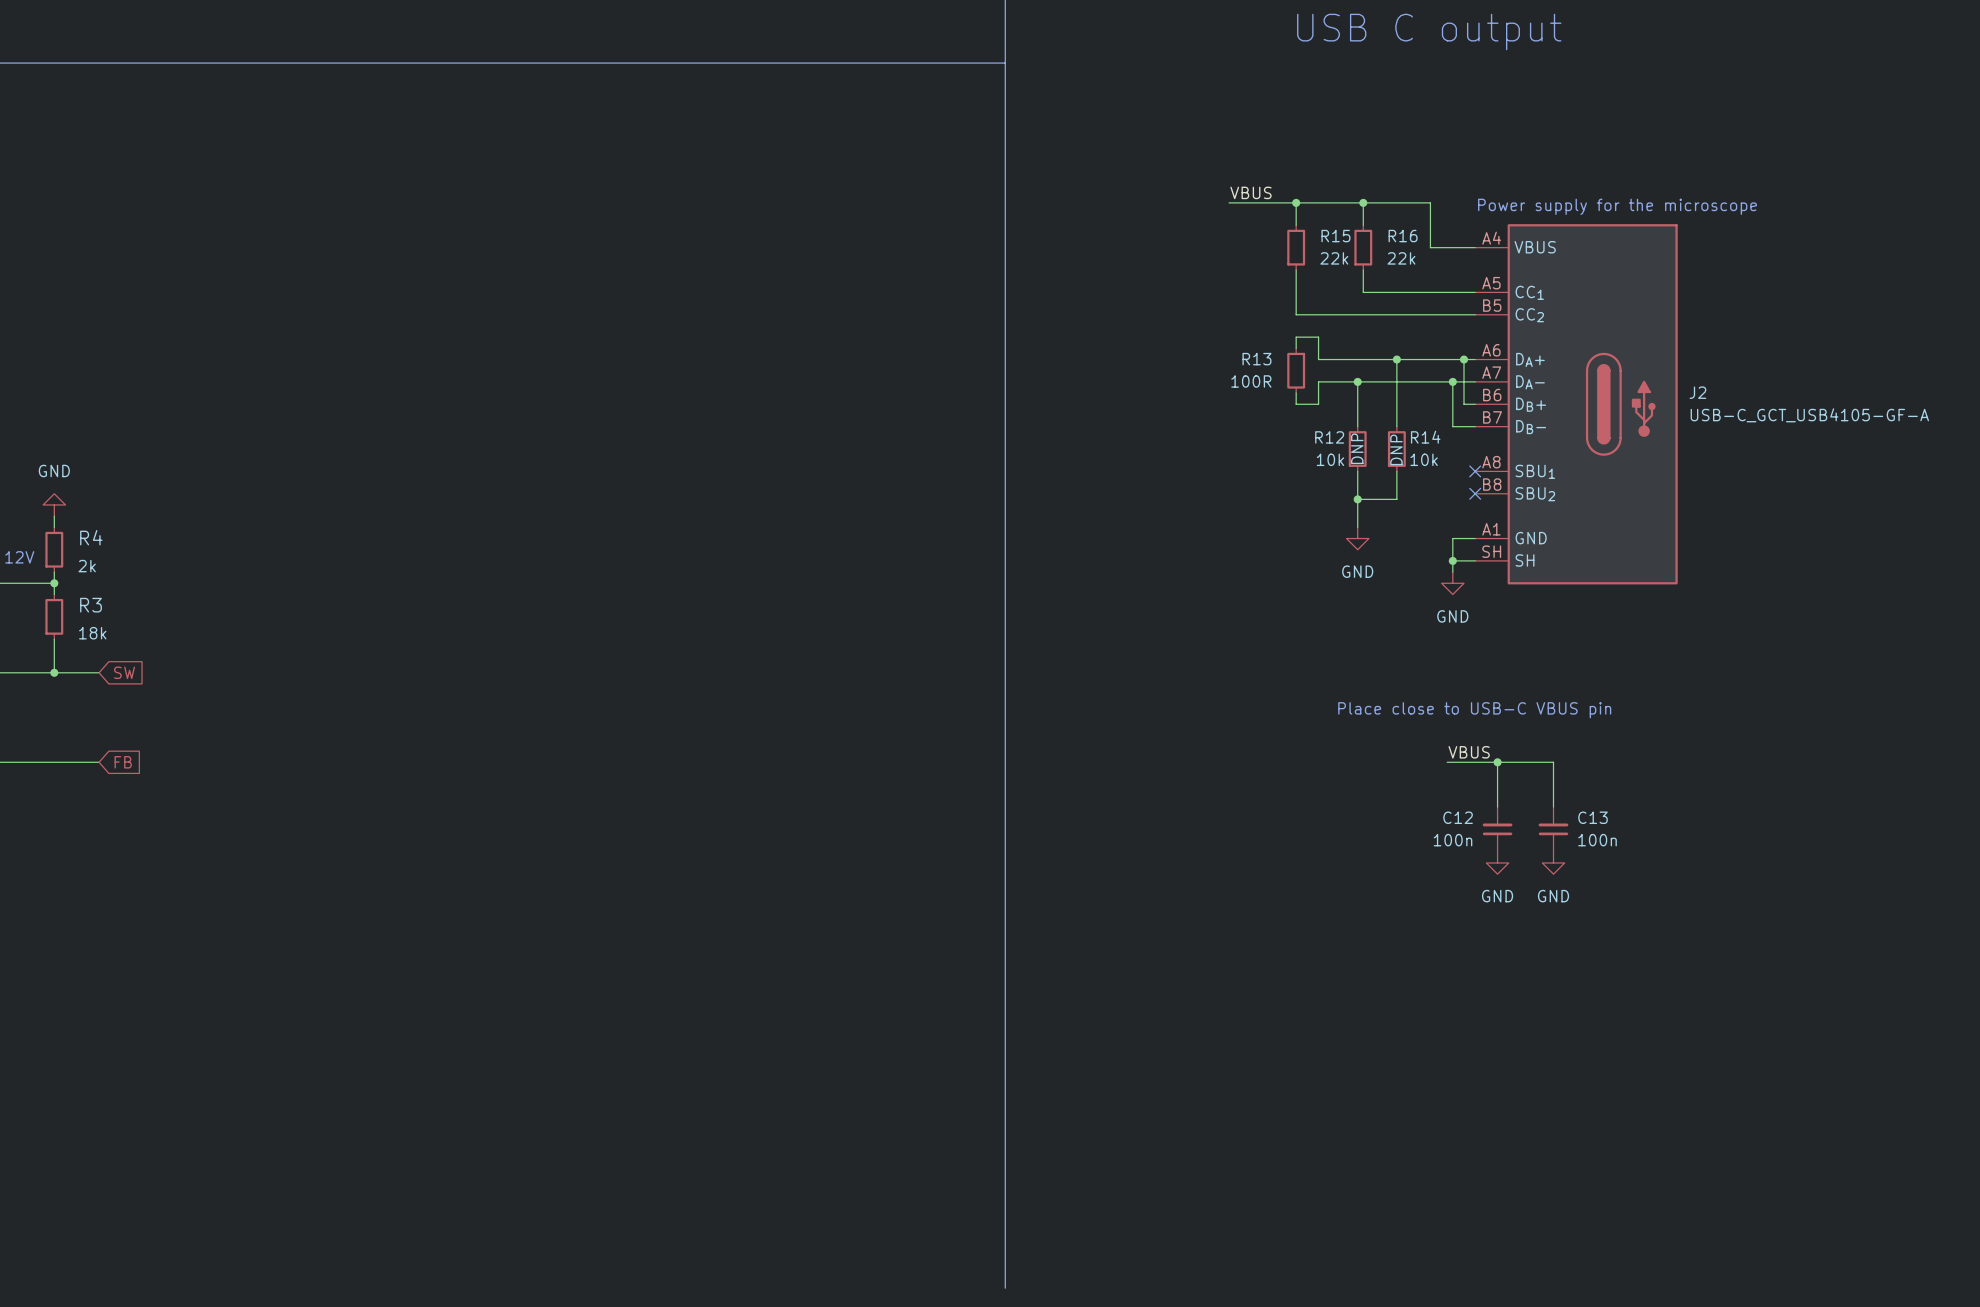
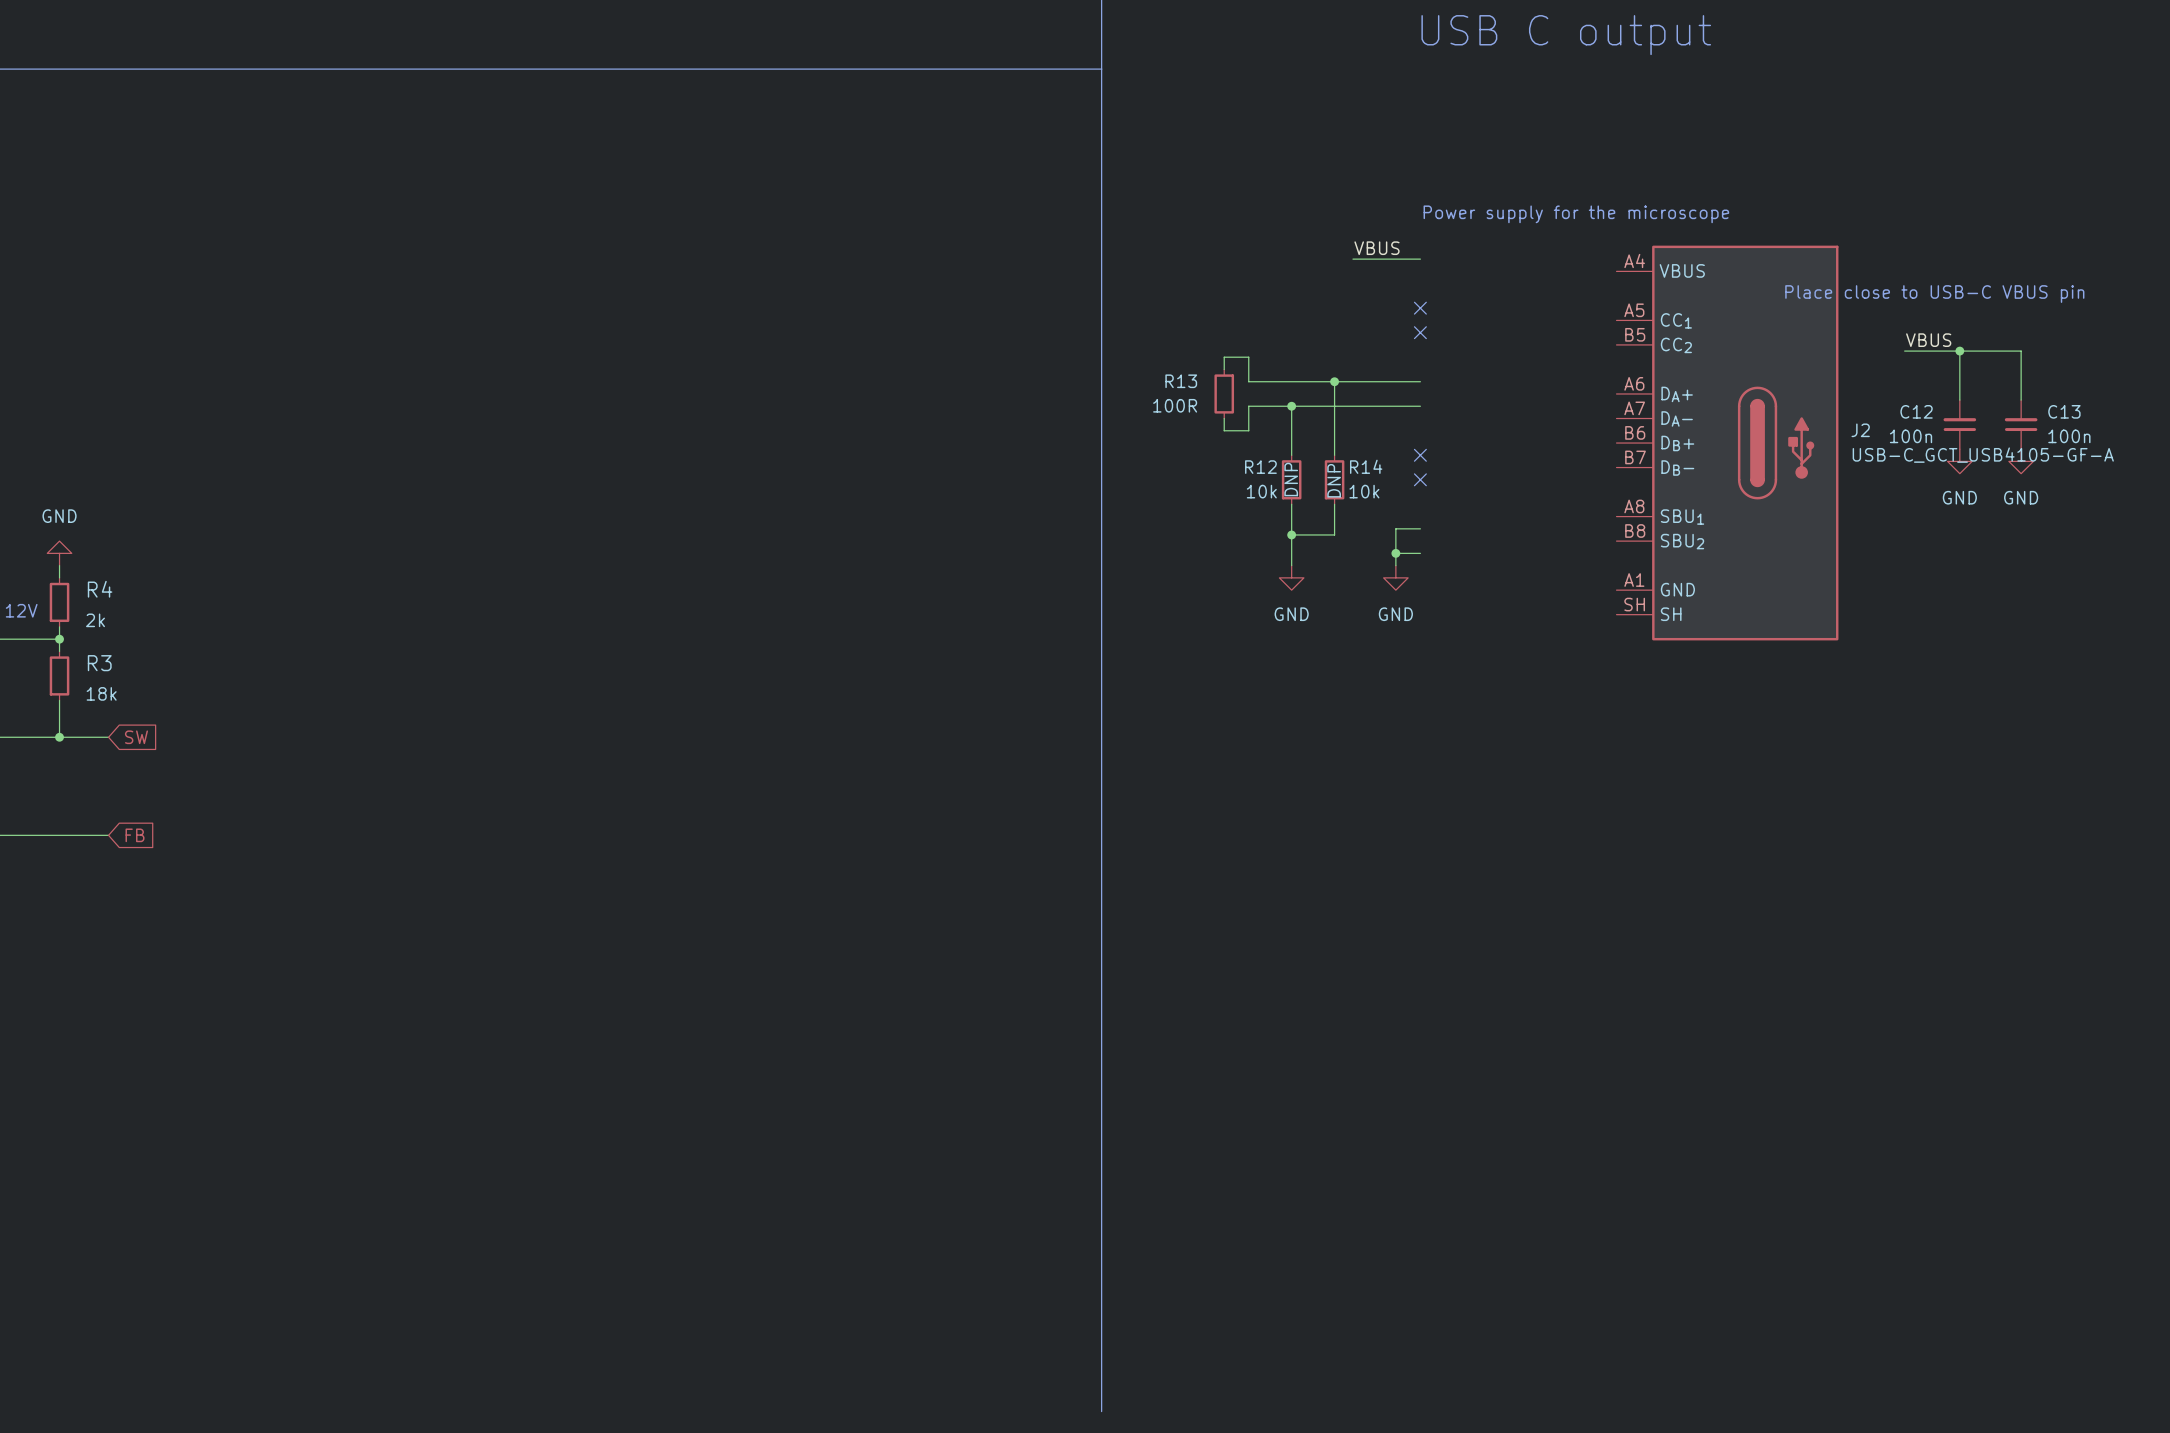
label position: VBUS (1250, 192) -> VBUS (1376, 248)
wire: (1229, 202) (1430, 202) (1430, 247) (1475, 247) -> none
wire: (1296, 202) (1296, 225) -> none
junction: (1296, 202) -> none
wire: (1363, 202) (1363, 225) -> none
junction: (1363, 202) -> none
text position: Power supply for the microscope (1617, 206) -> Power supply for the microscope (1576, 214)
wire: none -> (1352, 259) (1420, 259)
R15: (1296, 247) -> none
R16: (1363, 247) -> none
text: none -> Place close to USB-C VBUS pin (1934, 294)
wire: (1296, 270) (1296, 314) (1475, 314) -> none
wire: (1363, 270) (1363, 292) (1475, 292) -> none
no-connect mark: none -> (1420, 308)
no-connect mark: none -> (1420, 332)
label: none -> VBUS (1928, 340)
wire: none -> (1904, 351) (2021, 351) (2021, 400)
wire: none -> (1959, 351) (1959, 400)
junction: none -> (1959, 351)
junction: none -> (1334, 381)
wire: (1296, 348) (1296, 337) (1318, 337) (1318, 359) (1475, 359) -> (1420, 381) (1248, 381) (1248, 357) (1224, 357) (1224, 369)
wire: (1396, 359) (1396, 426) -> (1334, 381) (1334, 455)
junction: (1396, 359) -> none
wire: (1463, 359) (1463, 404) (1475, 404) -> none
junction: (1463, 359) -> none
junction: none -> (1291, 406)
R13 position: (1296, 370) -> (1224, 393)
wire: (1357, 381) (1357, 426) -> (1291, 406) (1291, 455)
junction: (1357, 381) -> none
wire: (1452, 381) (1452, 426) (1475, 426) -> none
junction: (1452, 381) -> none
wire: (1475, 381) (1318, 381) (1318, 404) (1296, 404) (1296, 393) -> (1420, 406) (1248, 406) (1248, 430) (1224, 430) (1224, 418)
no-connect mark: none -> (1420, 455)
power symbol: none -> GND (1959, 461)
power symbol: none -> GND (2021, 461)
no-connect mark: none -> (1420, 479)
R12 position: (1357, 449) -> (1291, 479)
R14 position: (1396, 449) -> (1334, 479)
wire: (1357, 471) (1357, 527) -> (1291, 504) (1291, 565)
wire: (1396, 471) (1396, 499) (1357, 499) -> (1334, 504) (1334, 534) (1291, 534)
no-connect mark: (1475, 471) -> none
junction: none -> (1291, 534)
no-connect mark: (1475, 493) -> none
junction: (1357, 499) -> none
junction: none -> (1395, 553)
power symbol: none -> GND (1291, 577)
power symbol position: GND (1357, 538) -> GND (1395, 577)
wire: (1475, 538) (1452, 538) (1452, 572) -> (1420, 528) (1395, 528) (1395, 565)
wire: (1452, 560) (1475, 560) -> (1395, 553) (1420, 553)
junction: (1452, 560) -> none
power symbol: GND (1452, 583) -> none
text: Place close to USB-C VBUS pin (1474, 710) -> none
label: VBUS (1469, 752) -> none
wire: (1447, 762) (1553, 762) (1553, 807) -> none
wire: (1497, 762) (1497, 807) -> none
junction: (1497, 762) -> none
C12 position: (1497, 829) -> (1959, 424)
C13 position: (1553, 829) -> (2021, 424)
power symbol: GND (1497, 862) -> none
power symbol: GND (1553, 862) -> none

